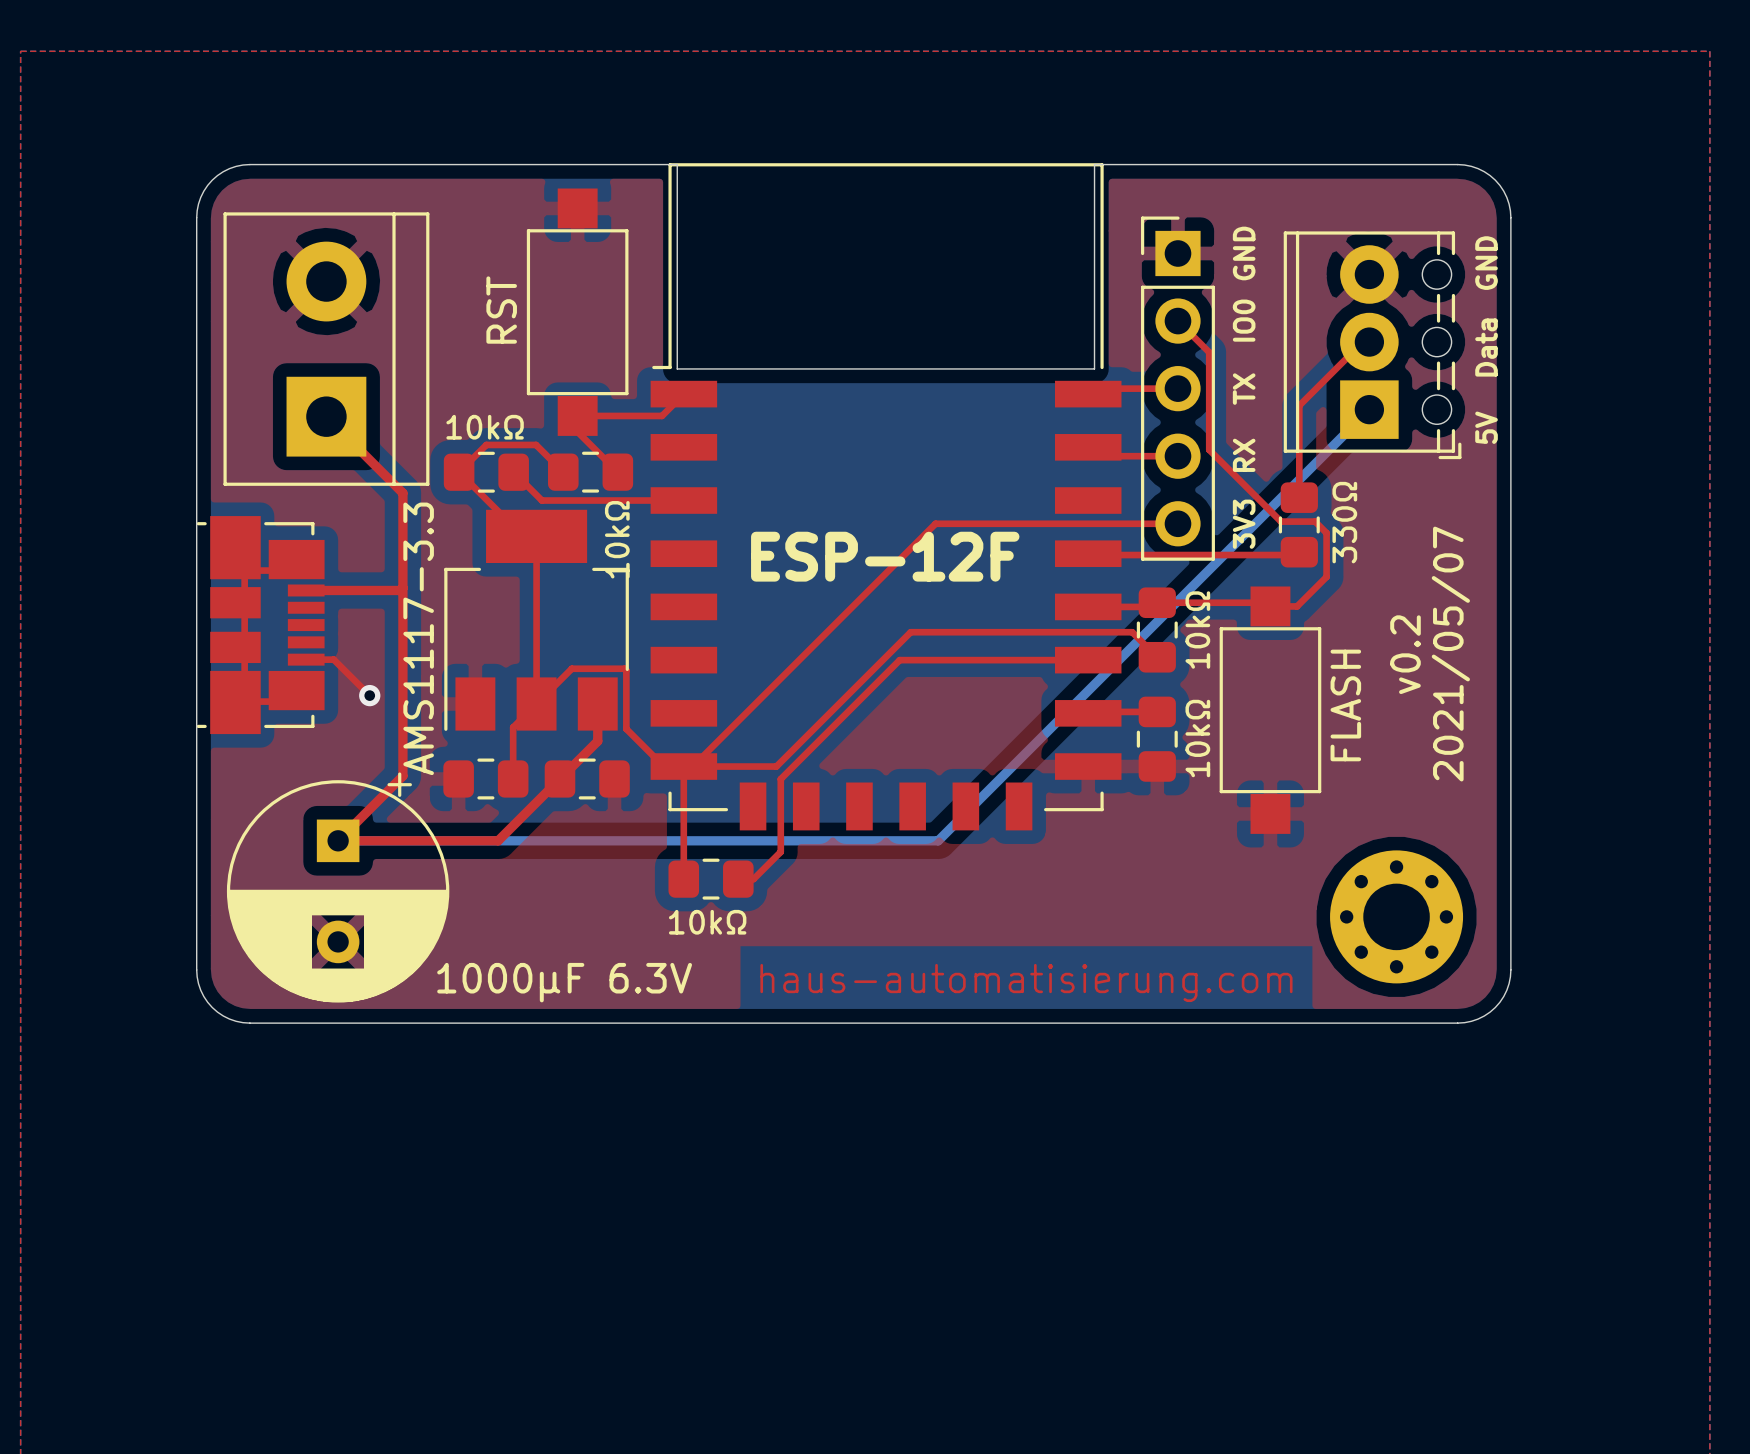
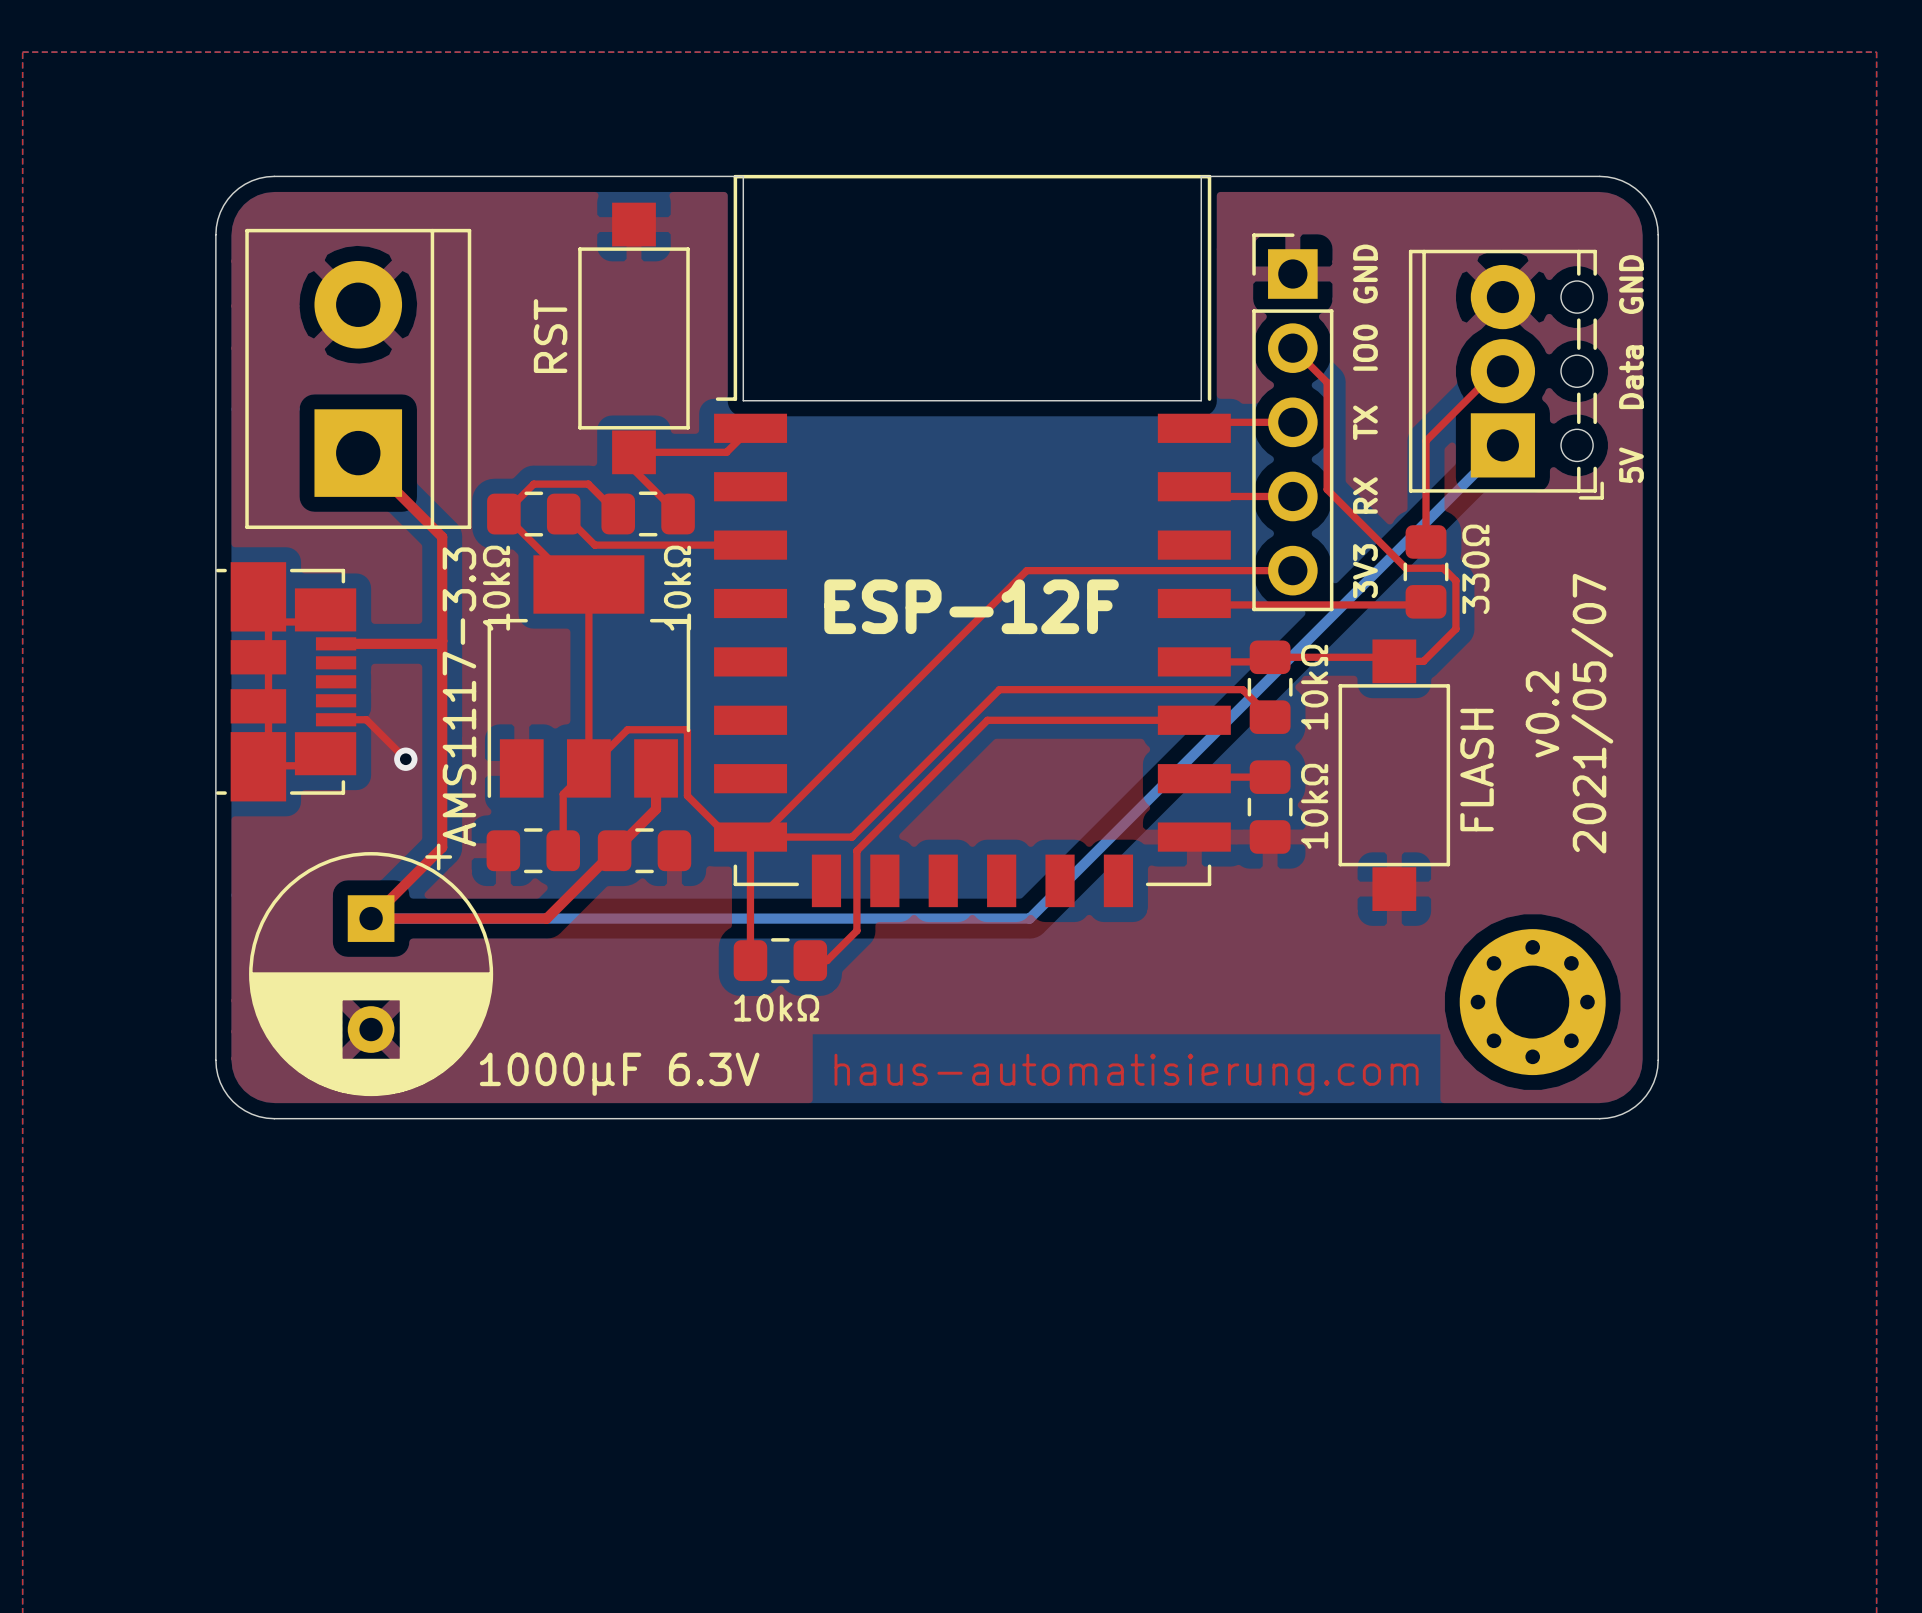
text rotation: 0° (485, 427) -> 90° counterclockwise (496, 588)
text position: 10kΩ (485, 427) -> 10kΩ (496, 588)

